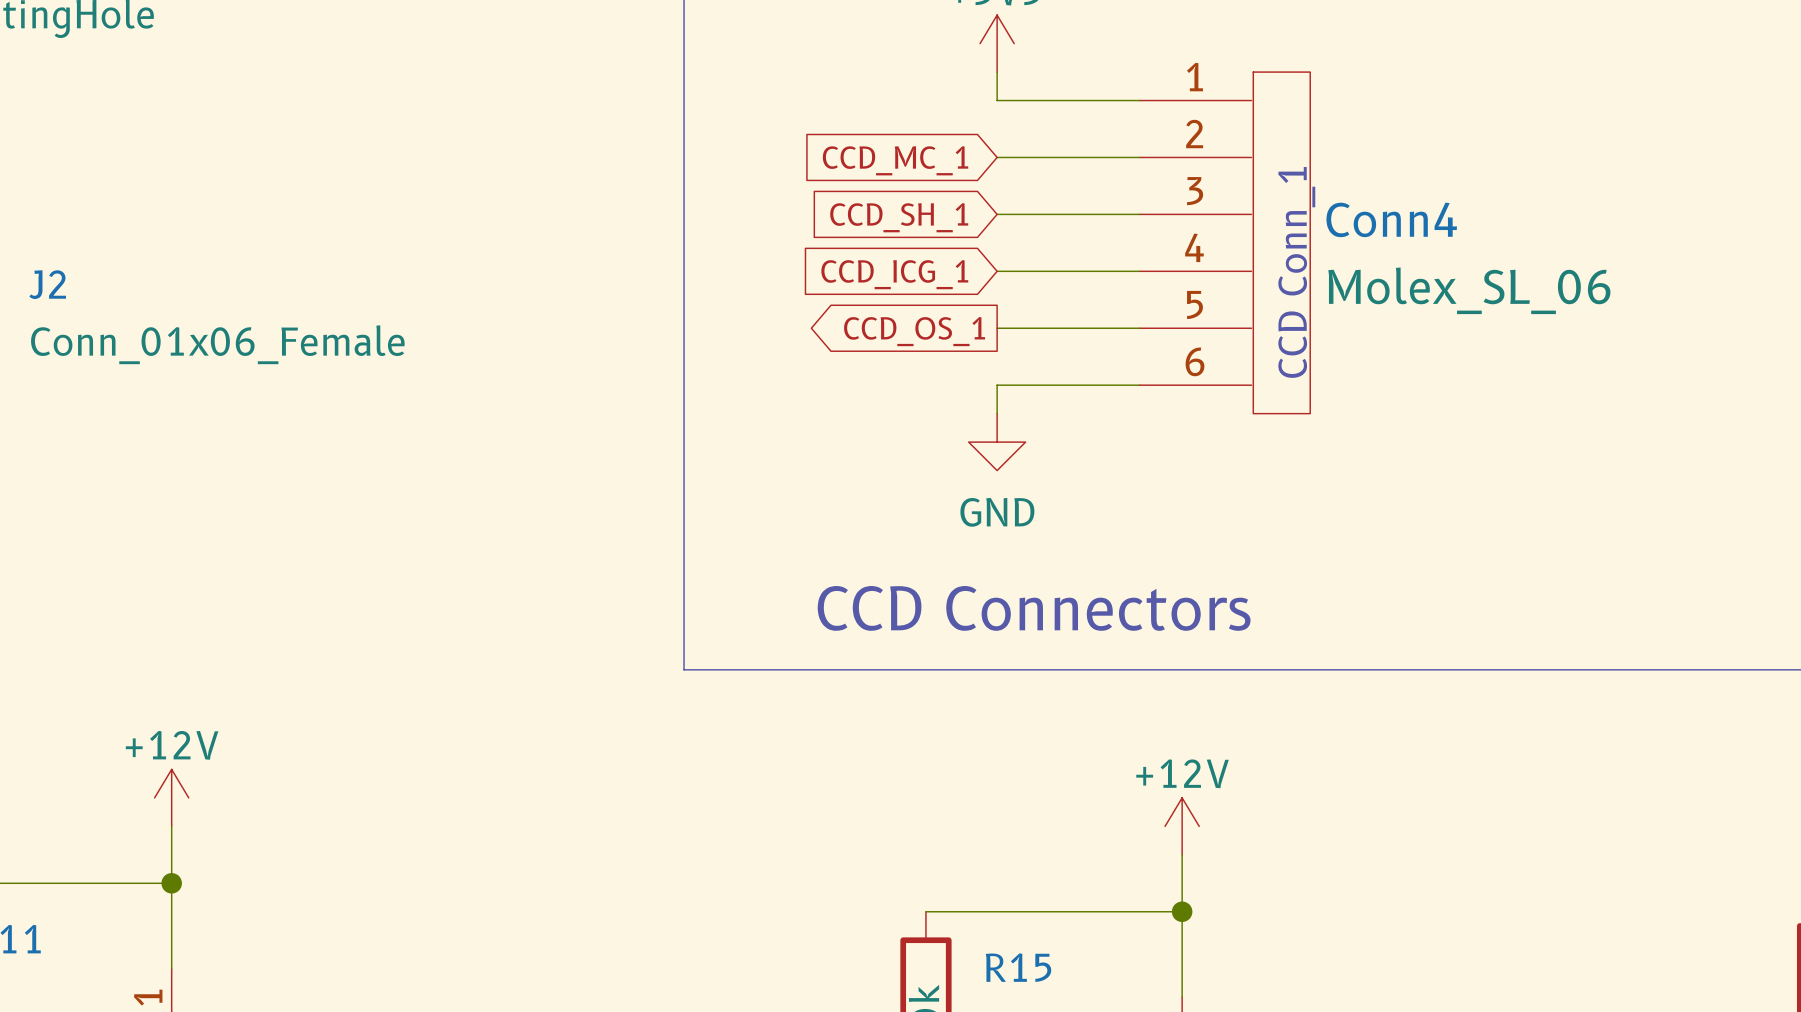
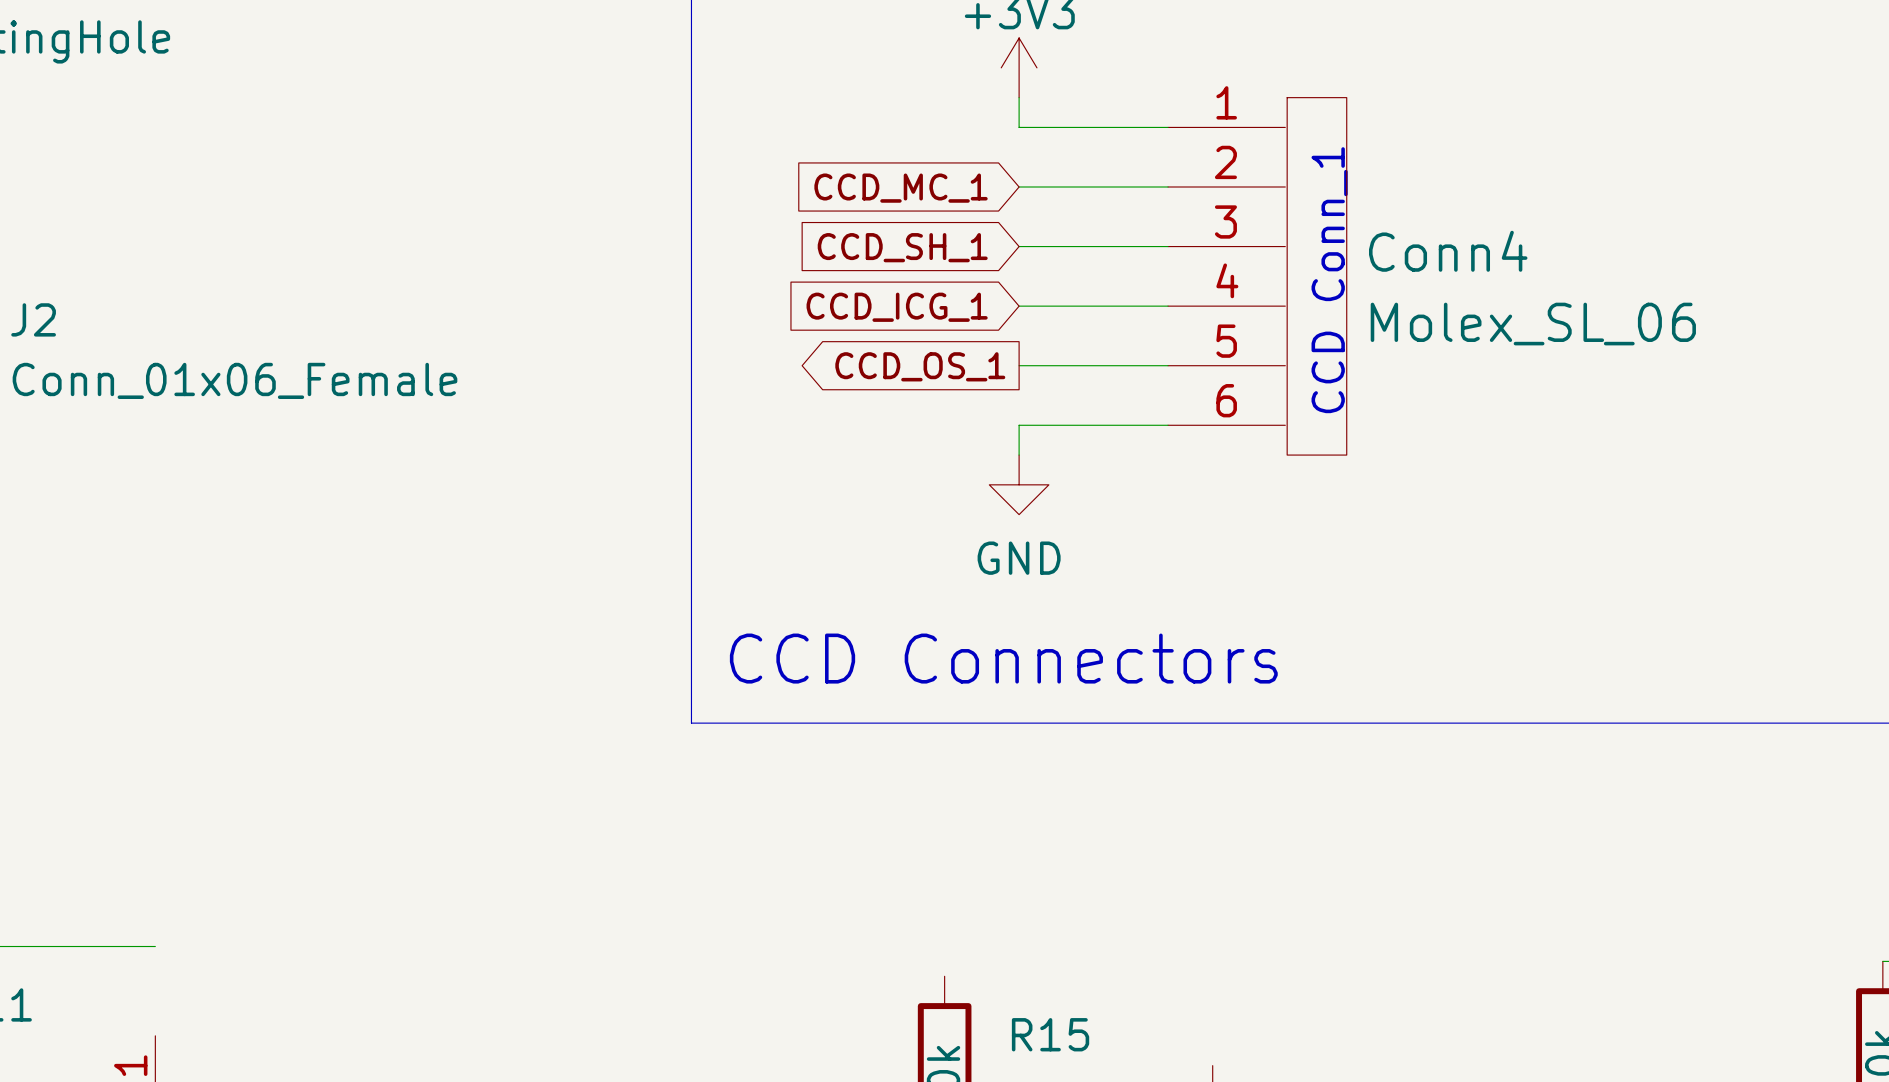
power symbol: +12V (171, 797) -> none
wire: (171, 826) (171, 968) -> none
power symbol: +12V (1182, 826) -> none
wire: (1182, 854) (1182, 997) -> none
junction: (171, 883) -> none
wire: (925, 911) (1182, 911) -> none
junction: (1182, 911) -> none

